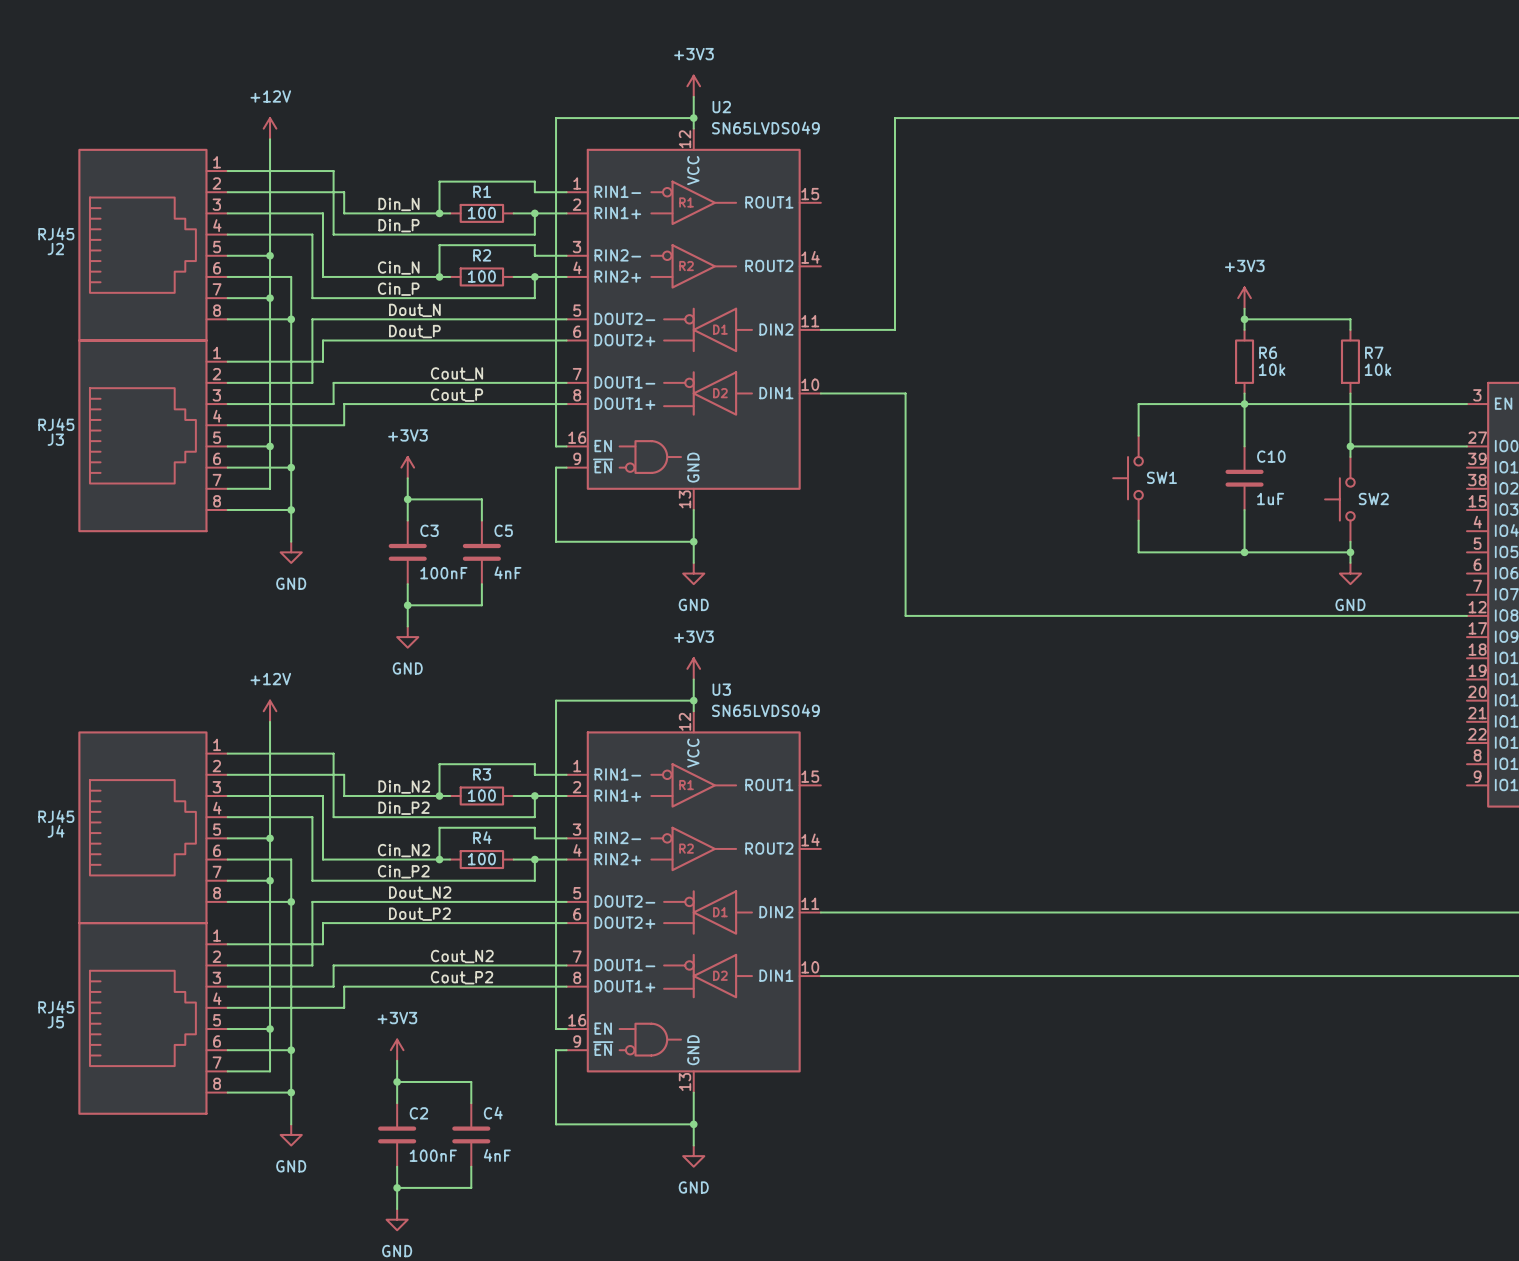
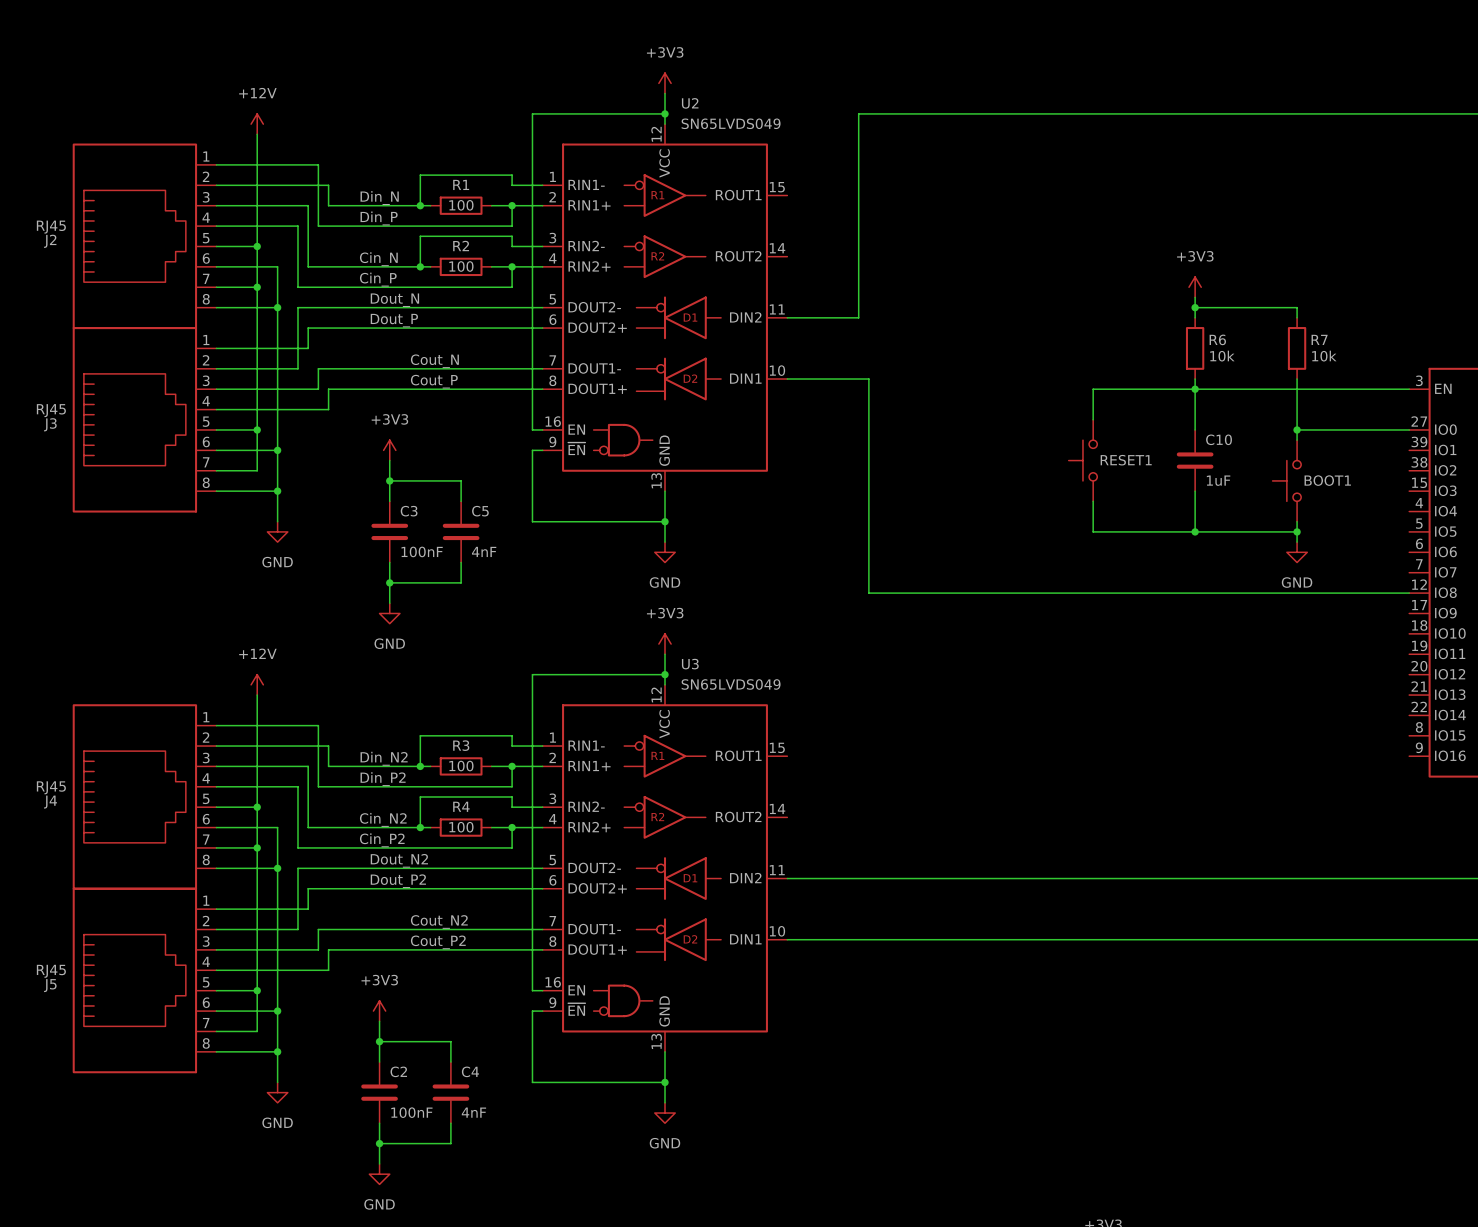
SW1 name: SW1 (1161, 477) -> RESET1 (1126, 460)
SW2 name: SW2 (1373, 499) -> BOOT1 (1327, 480)

